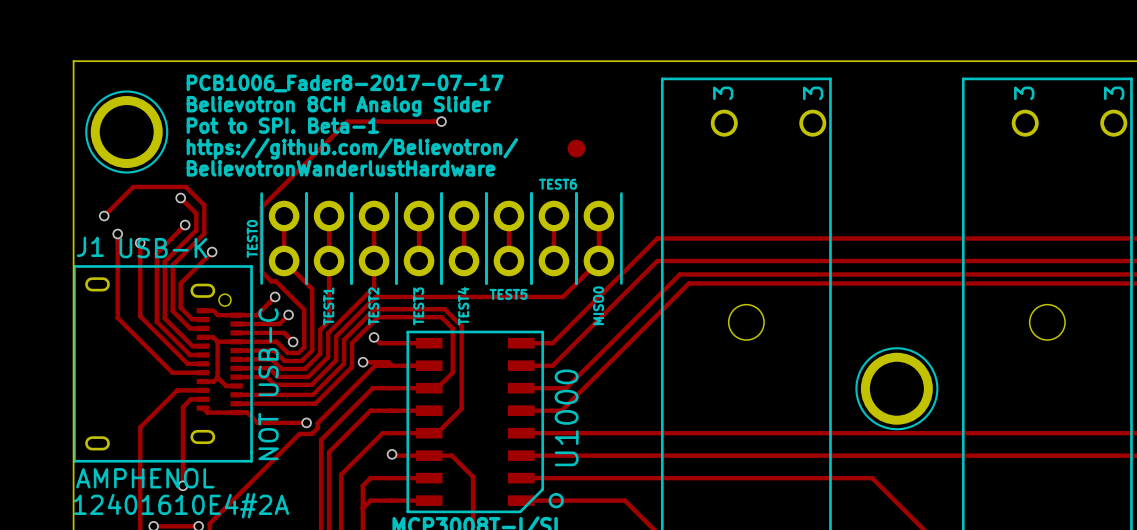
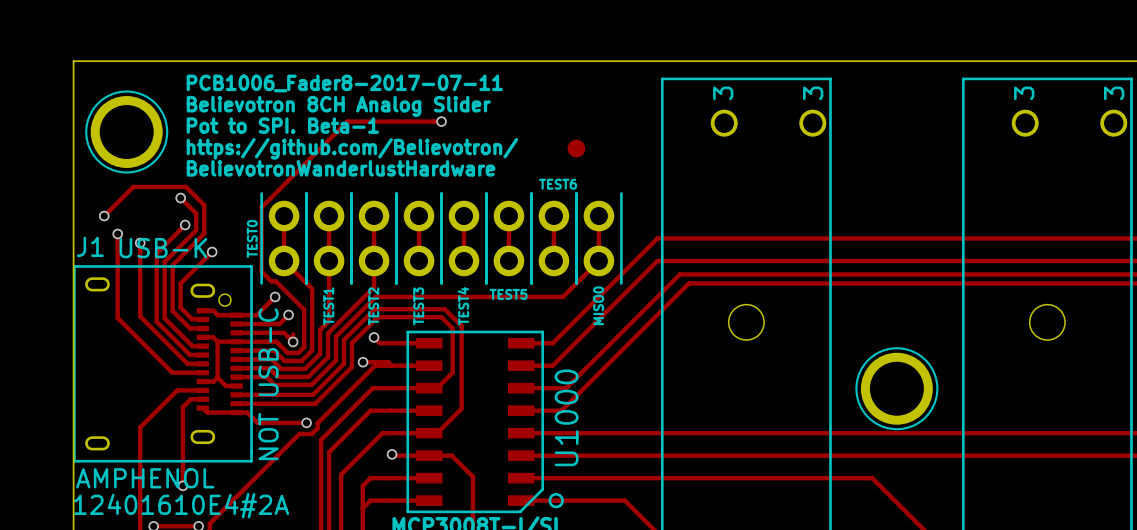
text: PCB1006_Fader8-2017-07-17 (345, 83) -> PCB1006_Fader8-2017-07-11 (344, 83)
track: none -> (293, 334) (293, 341)

